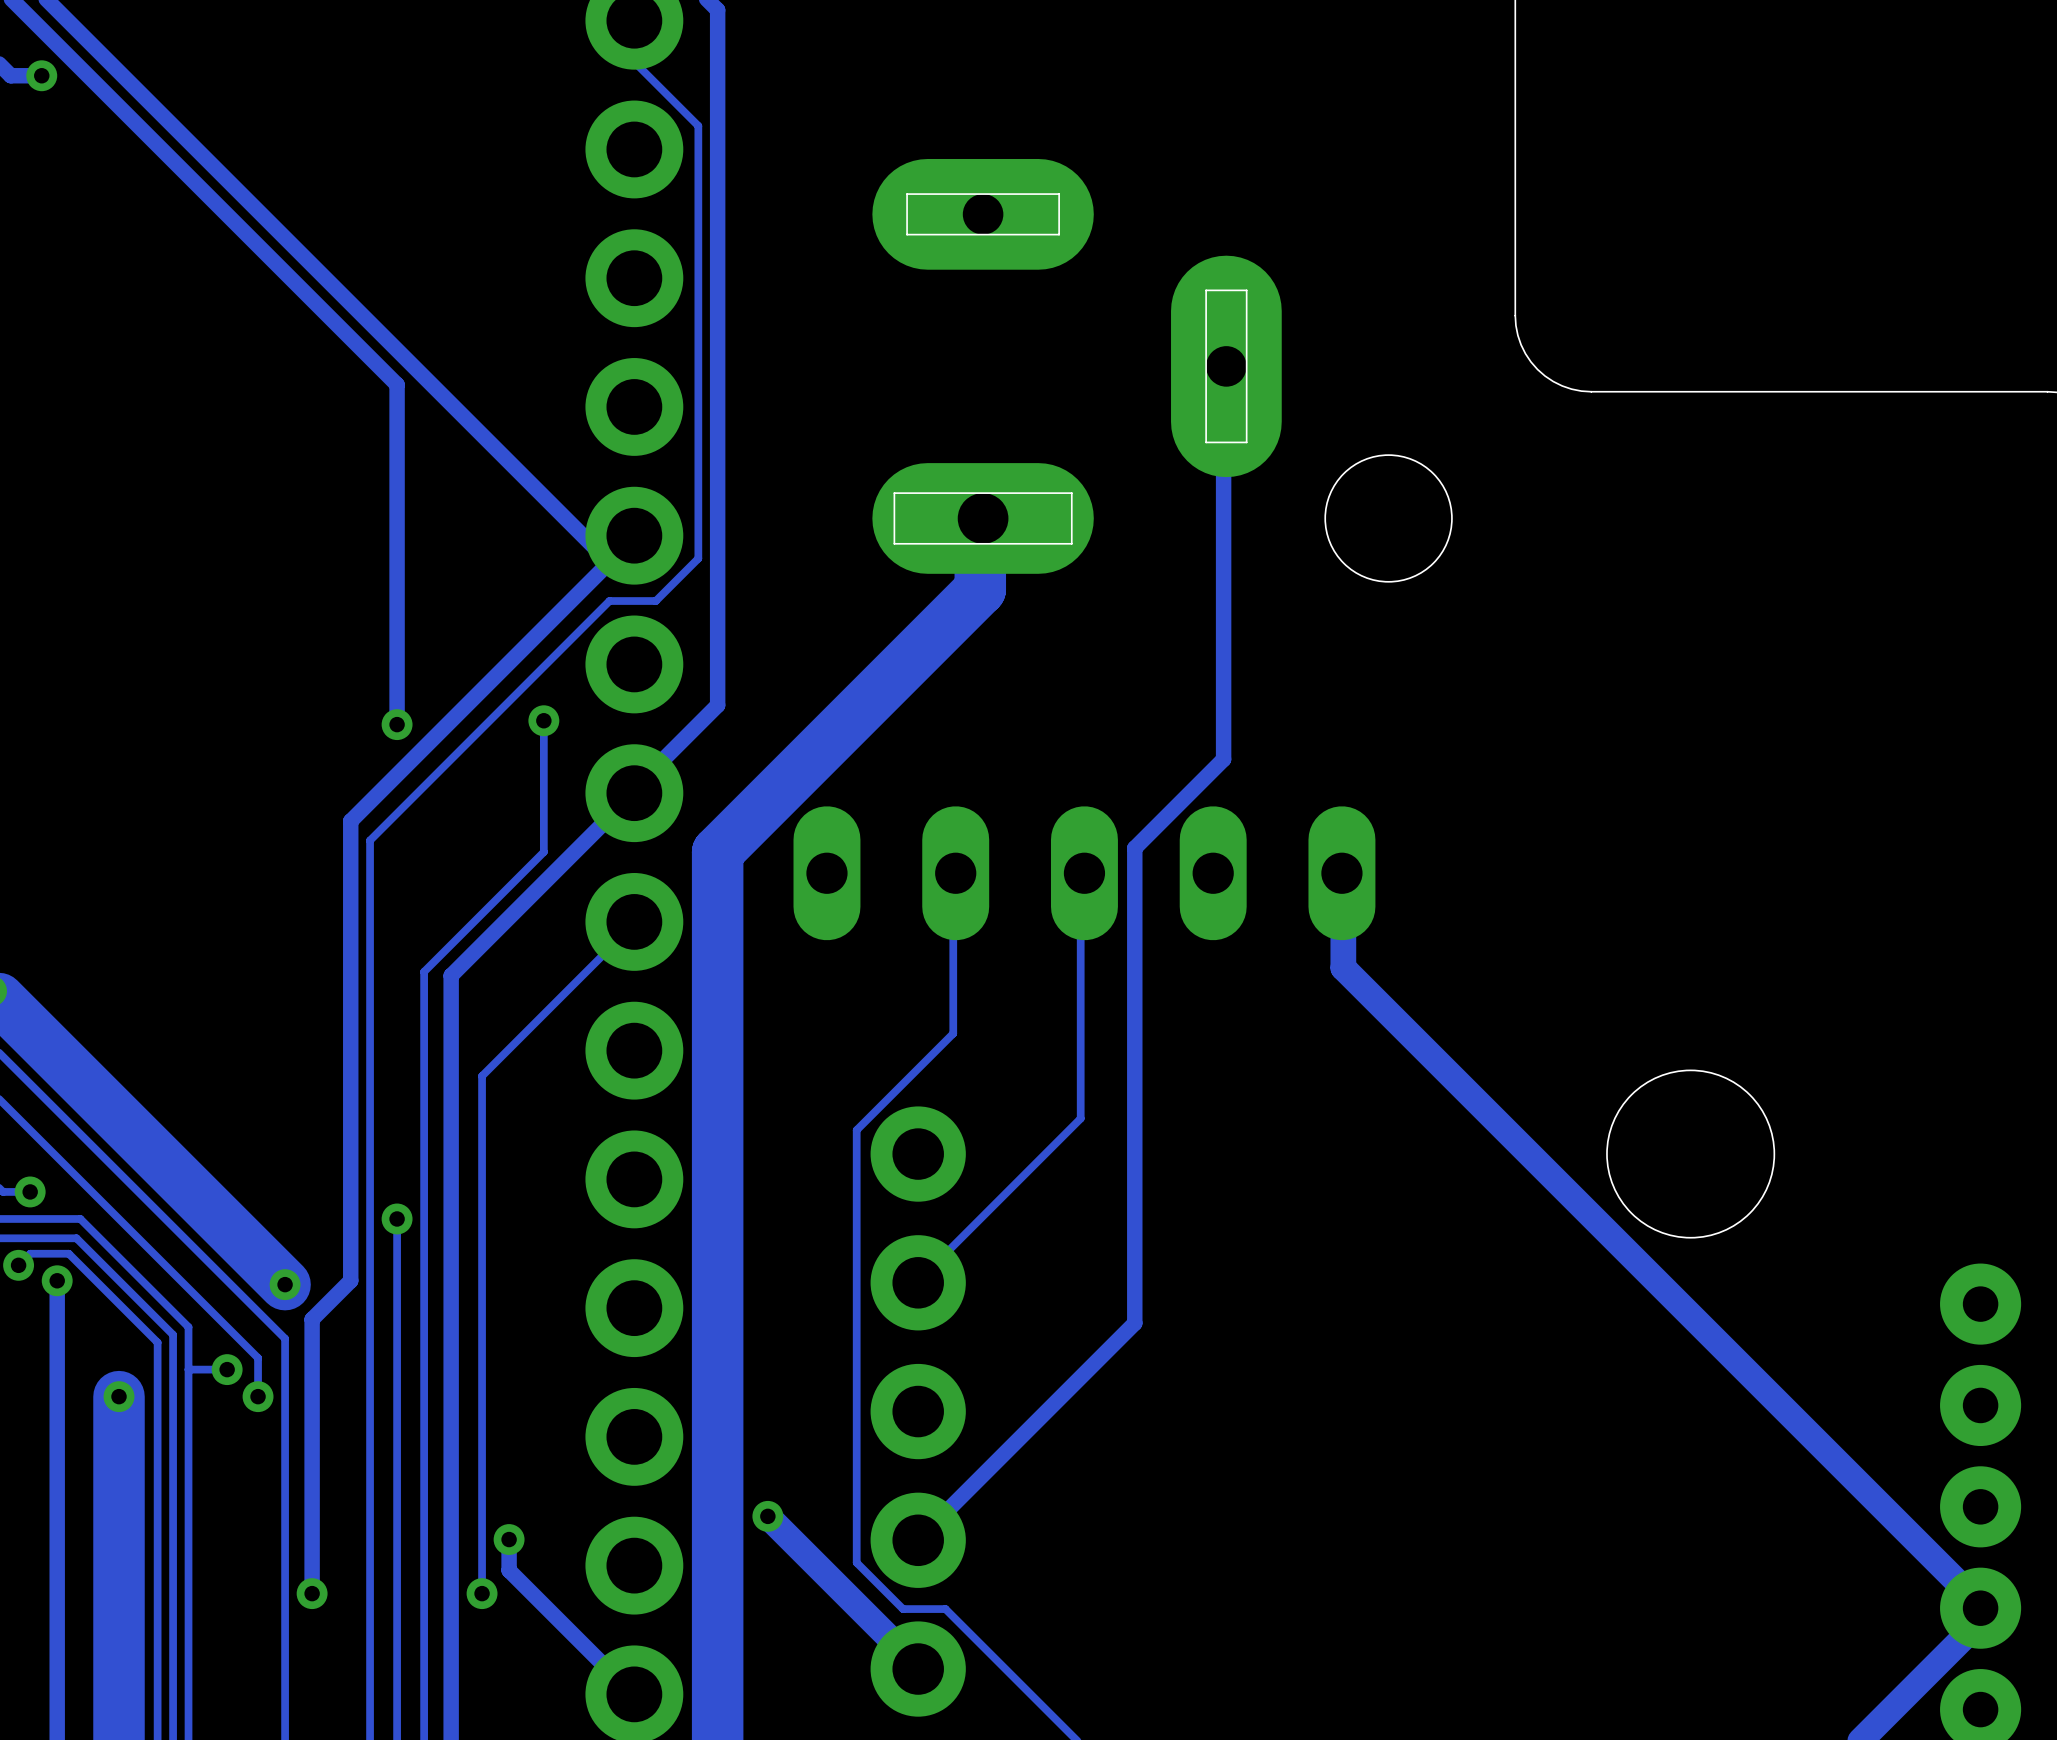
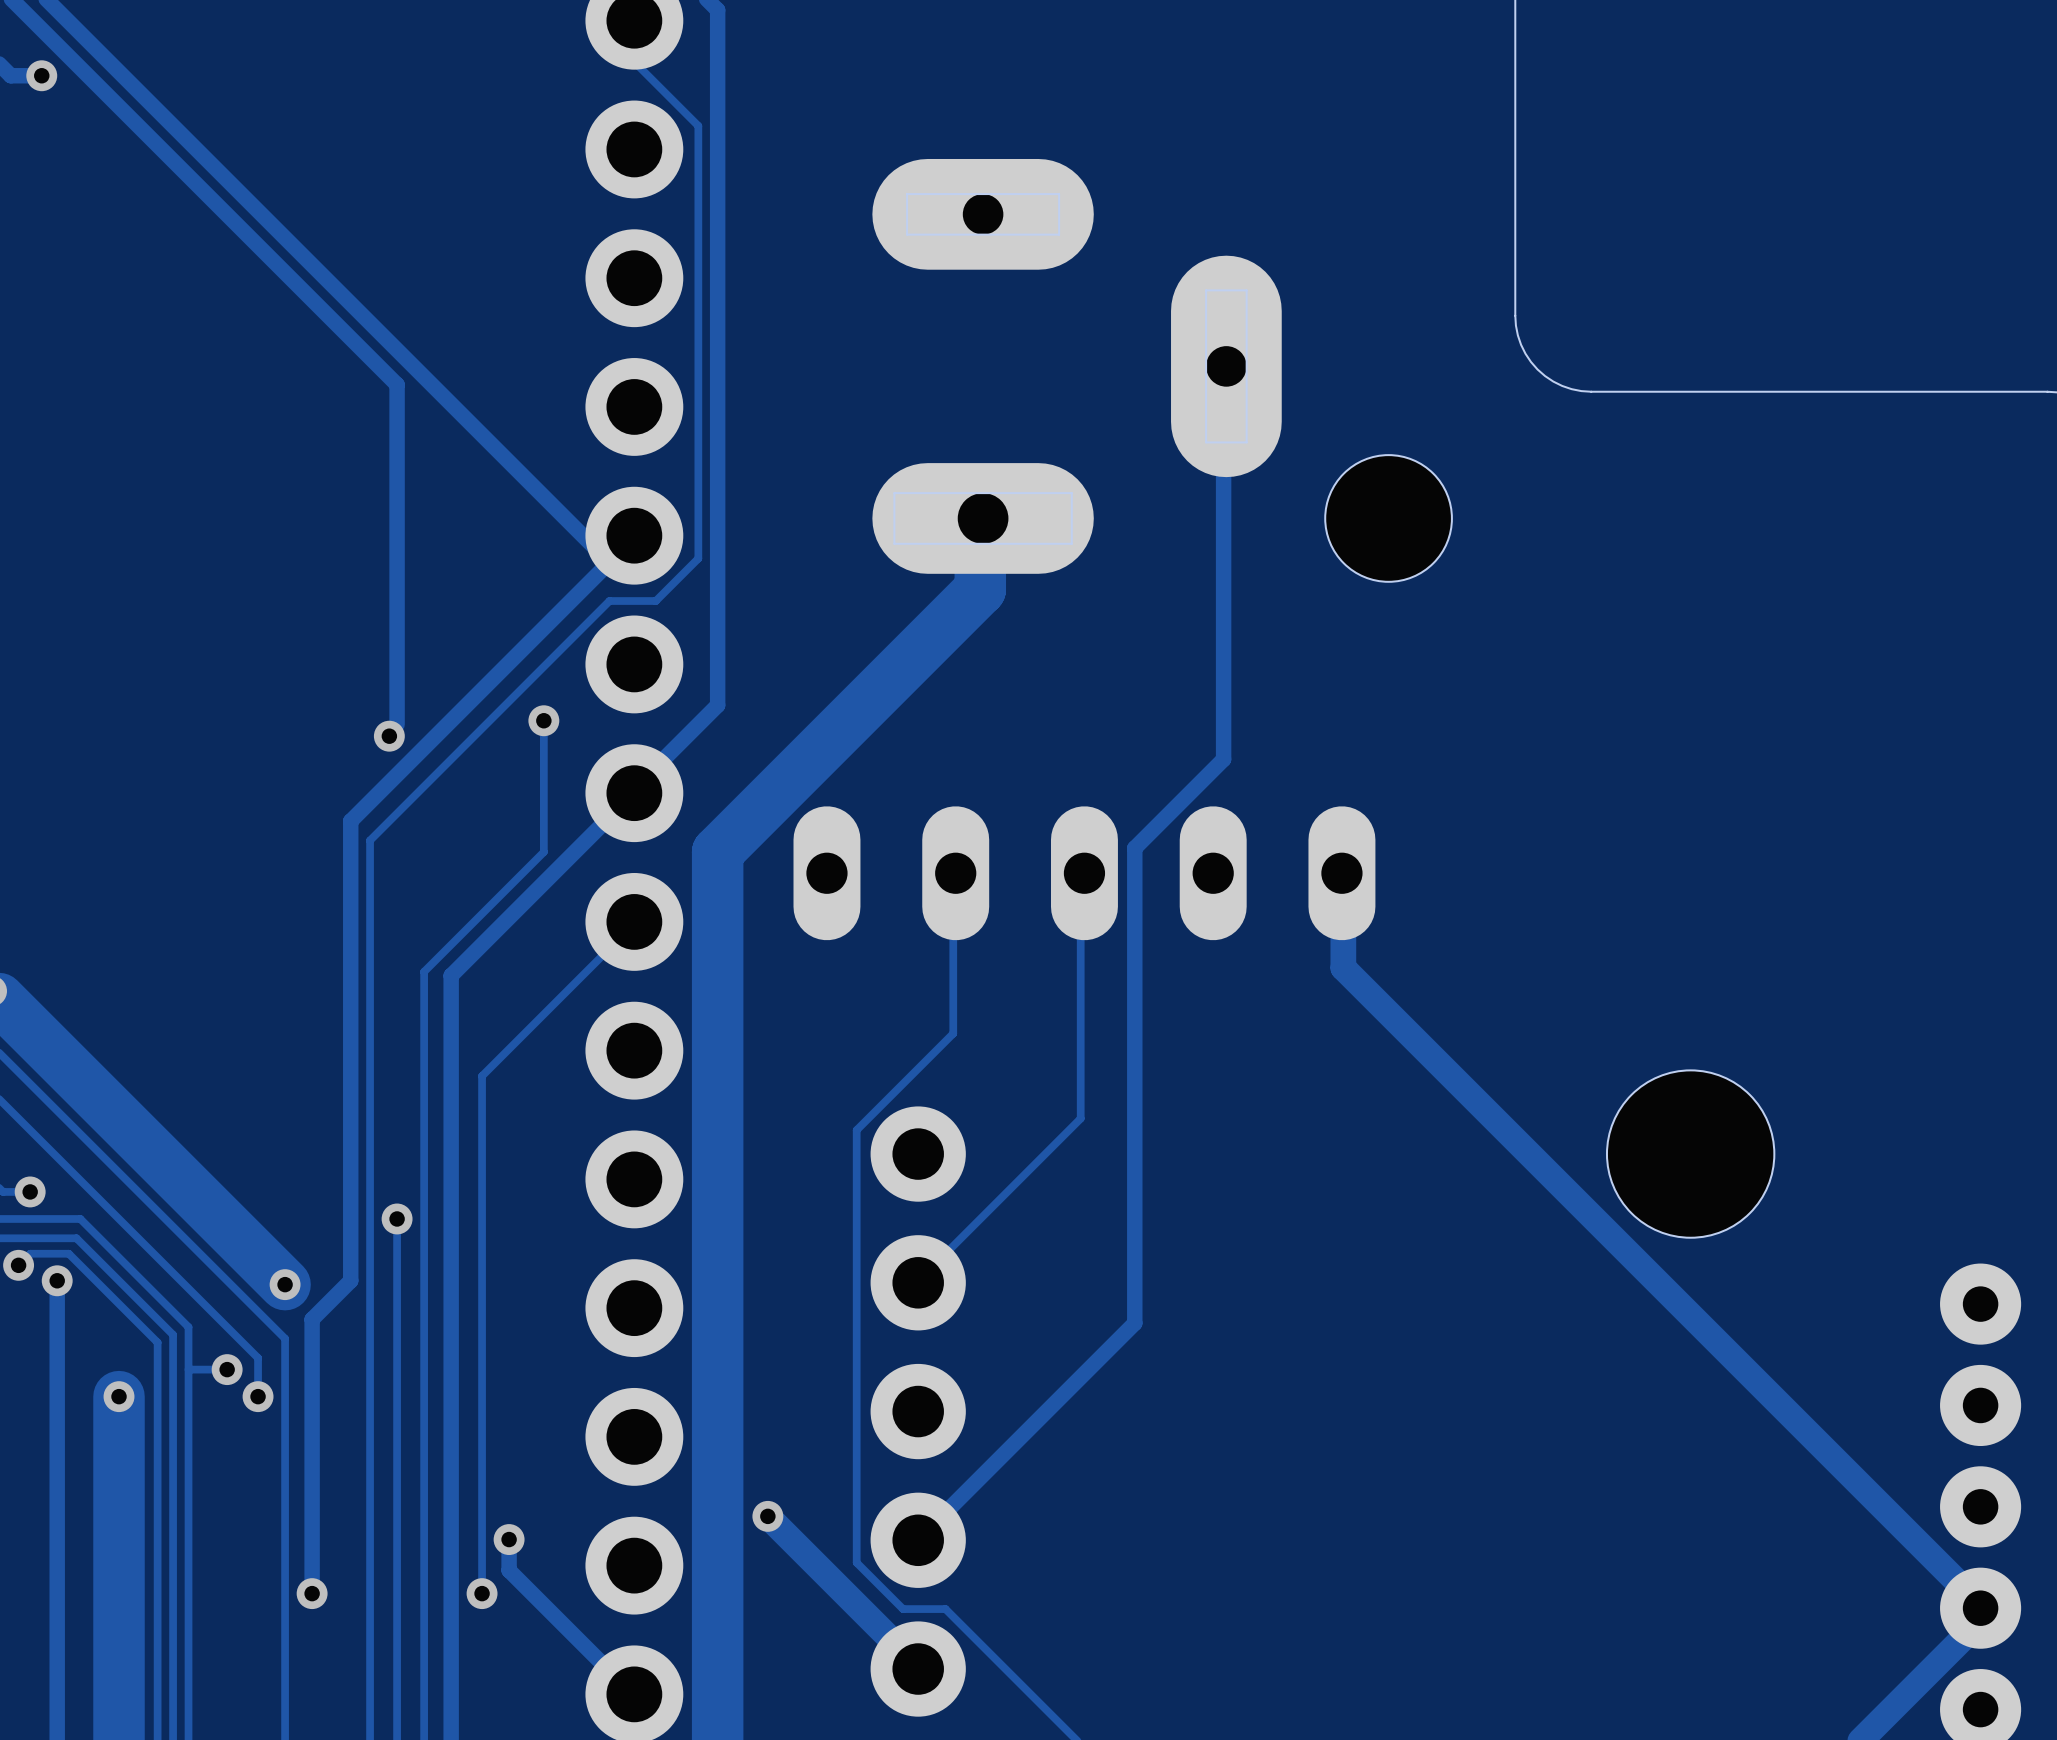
via position: (397, 724) -> (389, 736)

